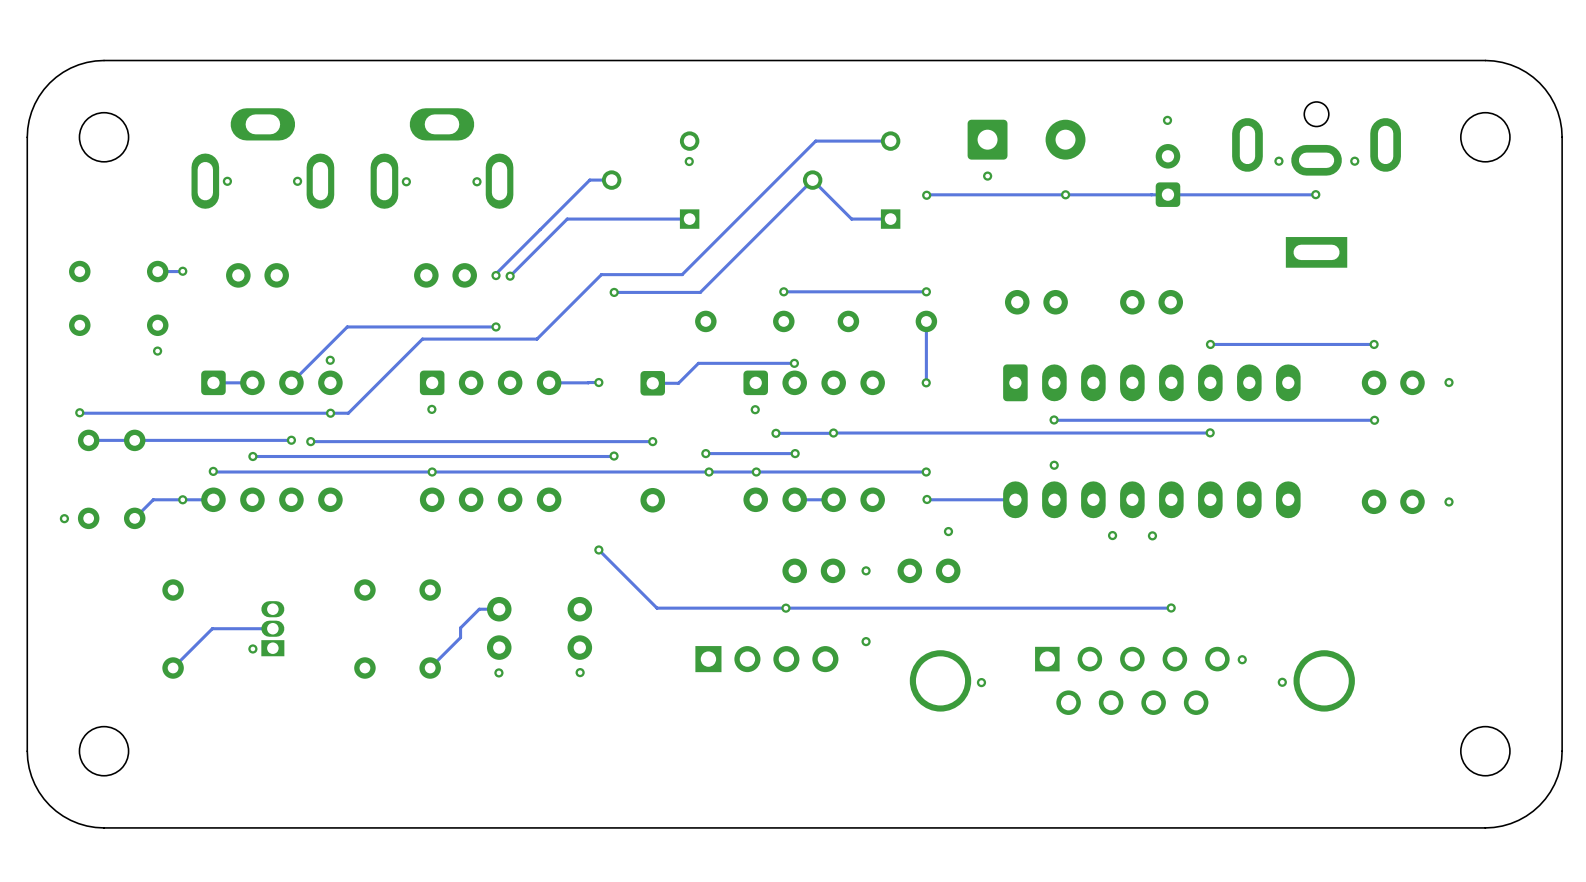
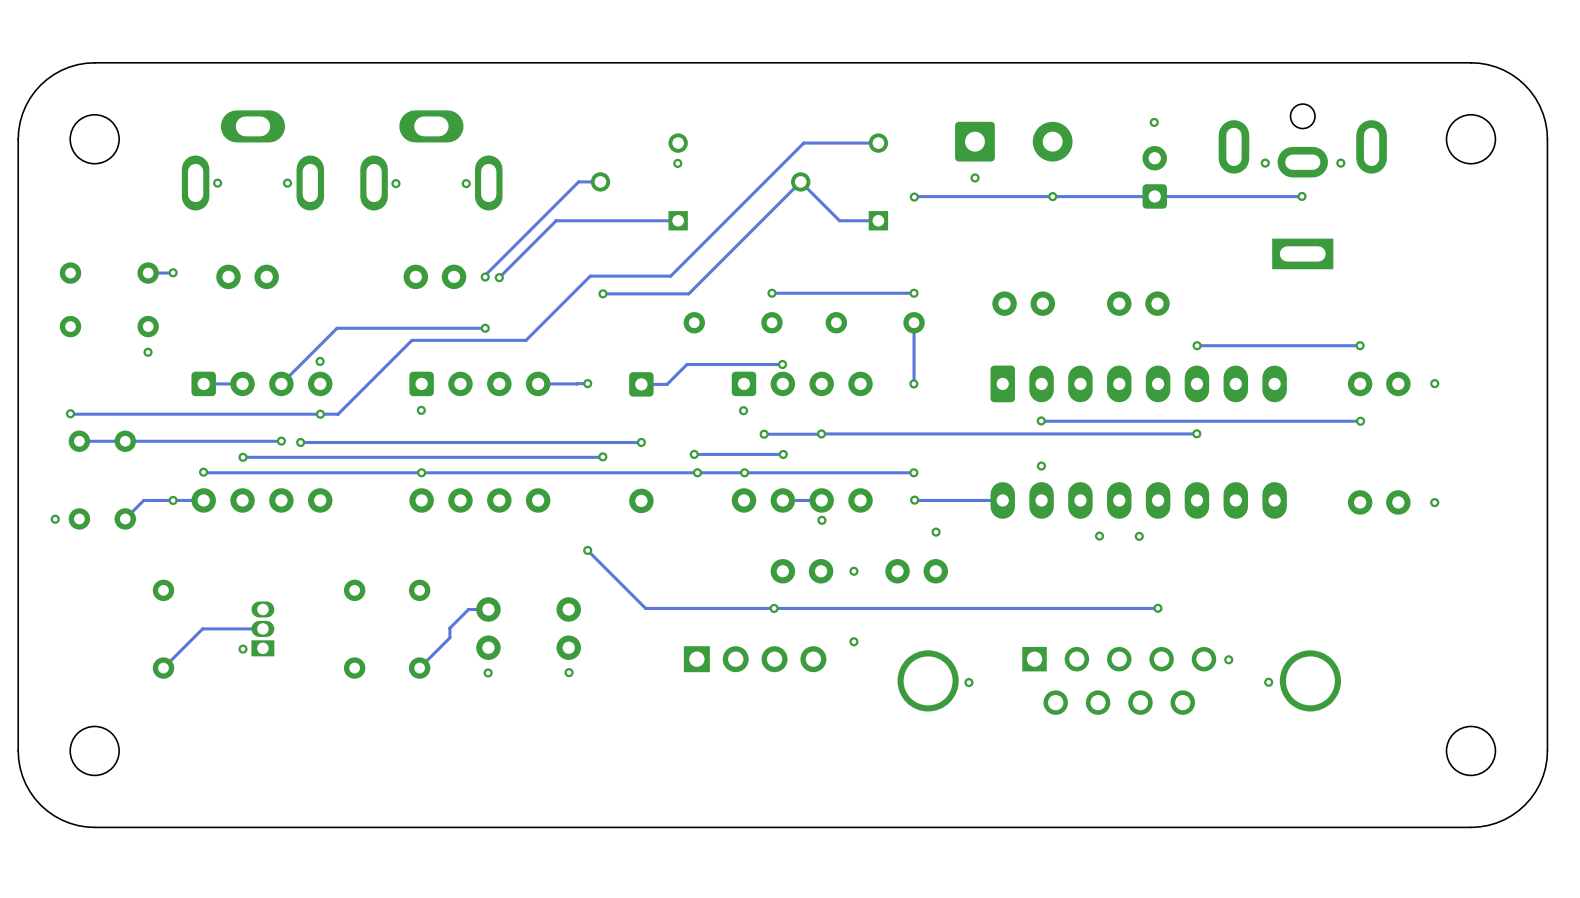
via: none -> (821, 520)

